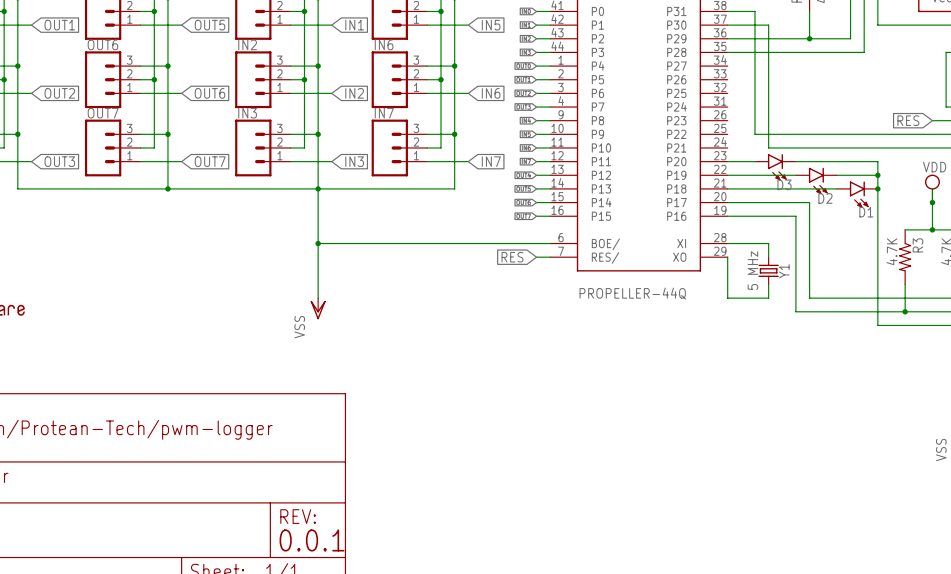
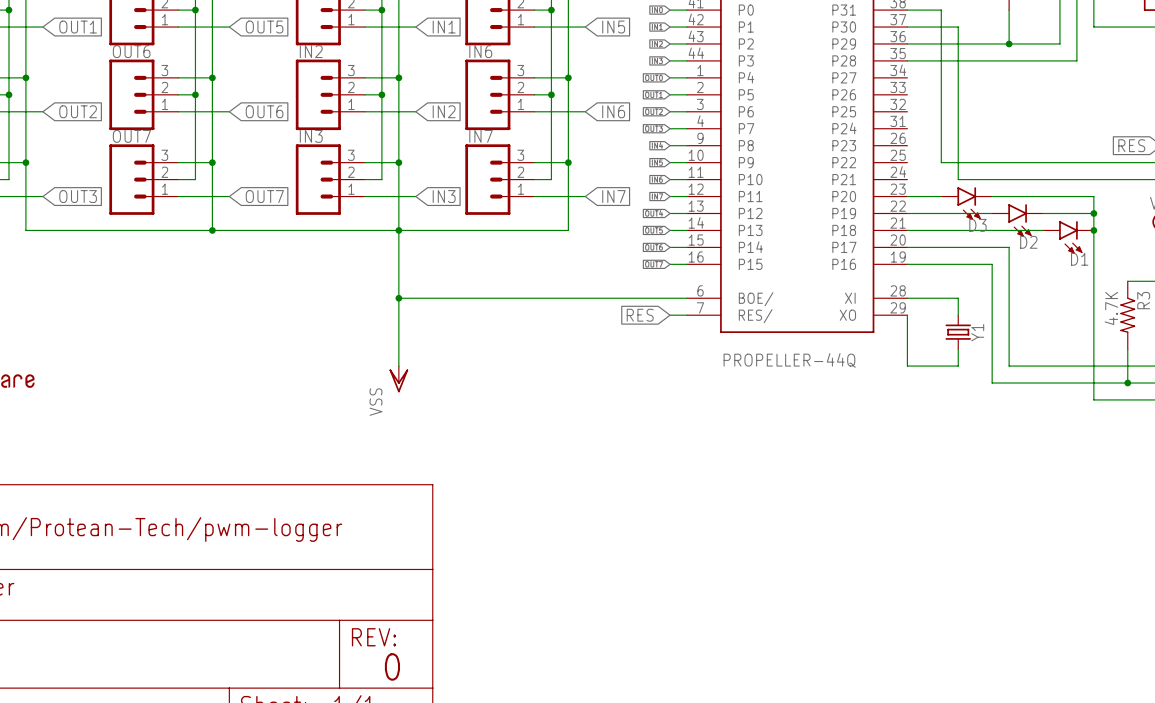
Y1 value: 5 MHz (752, 270) -> none
text: 0.0.1 (312, 540) -> none
text: none -> 0 (392, 666)

